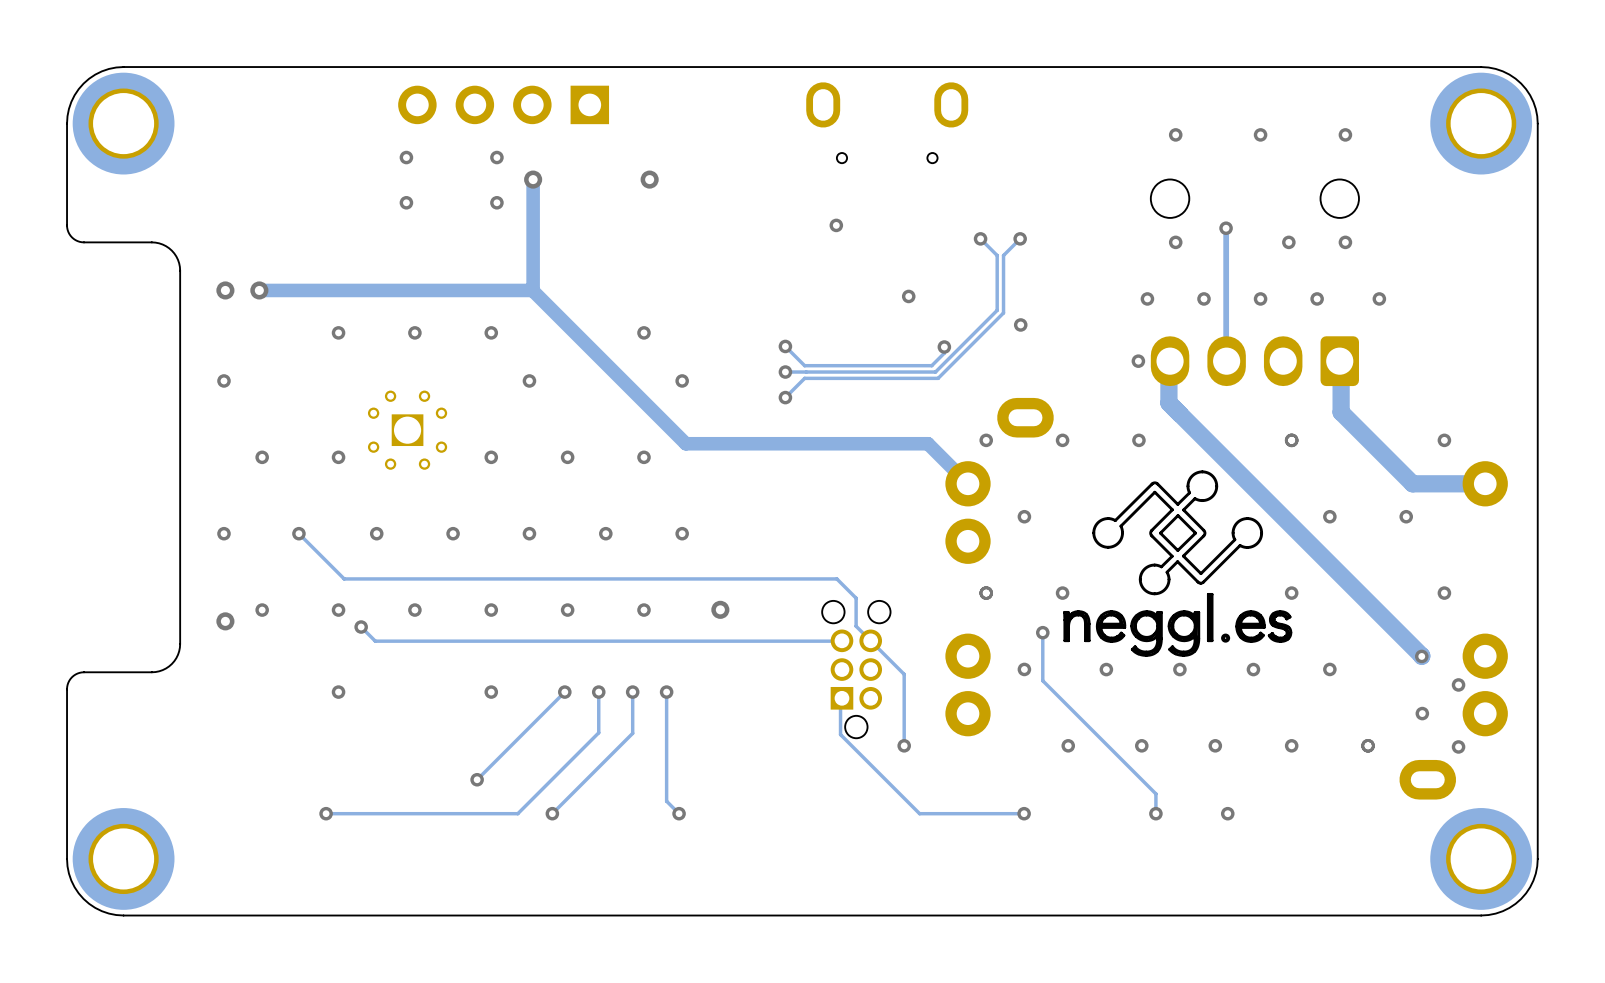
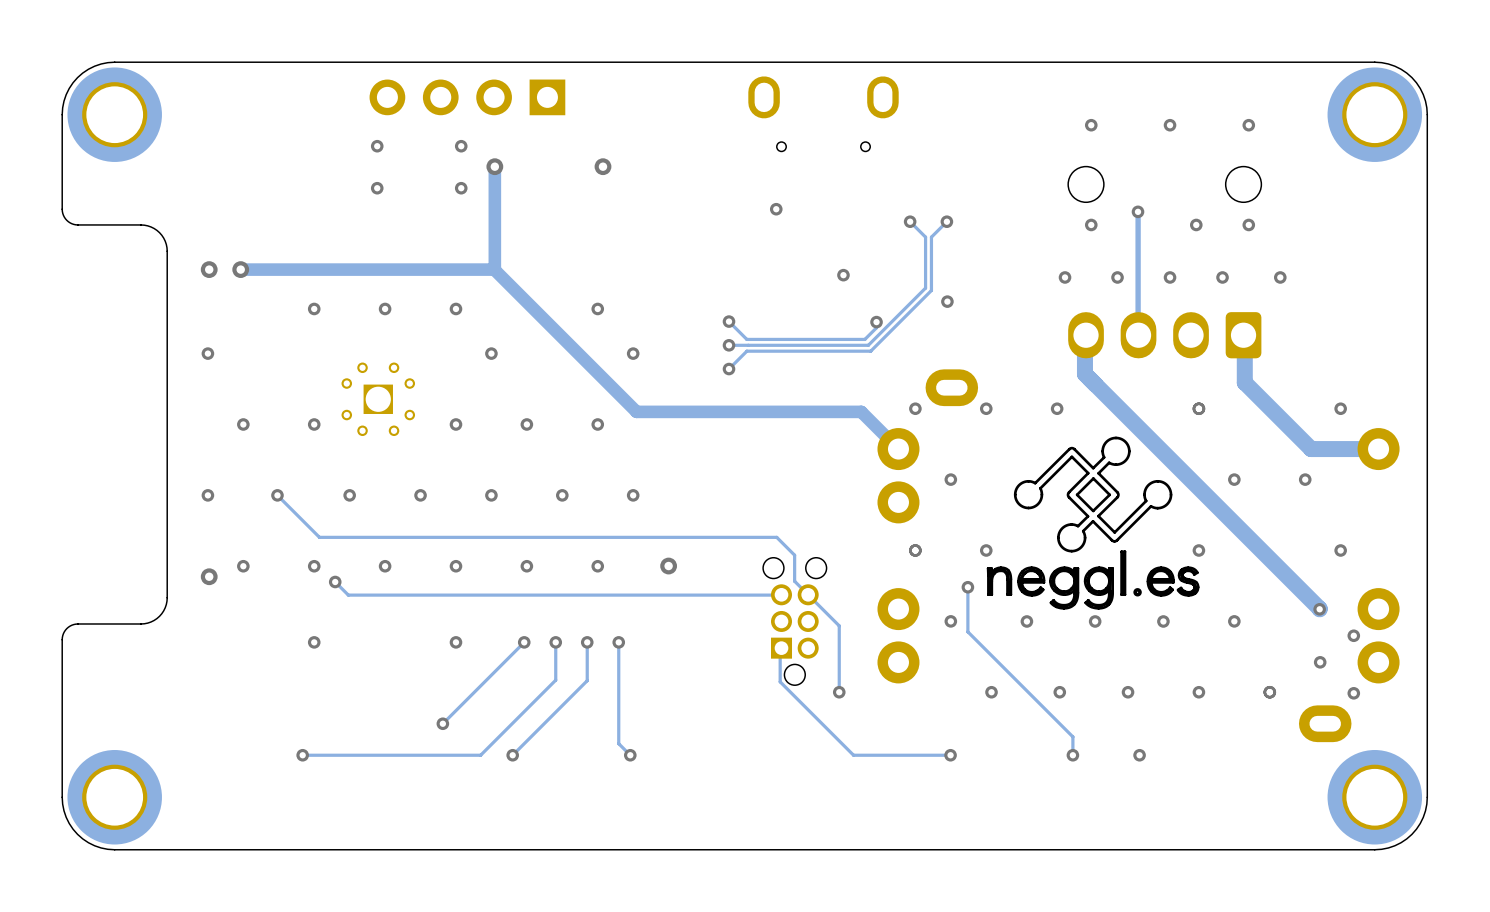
via: (1138, 361) -> none

